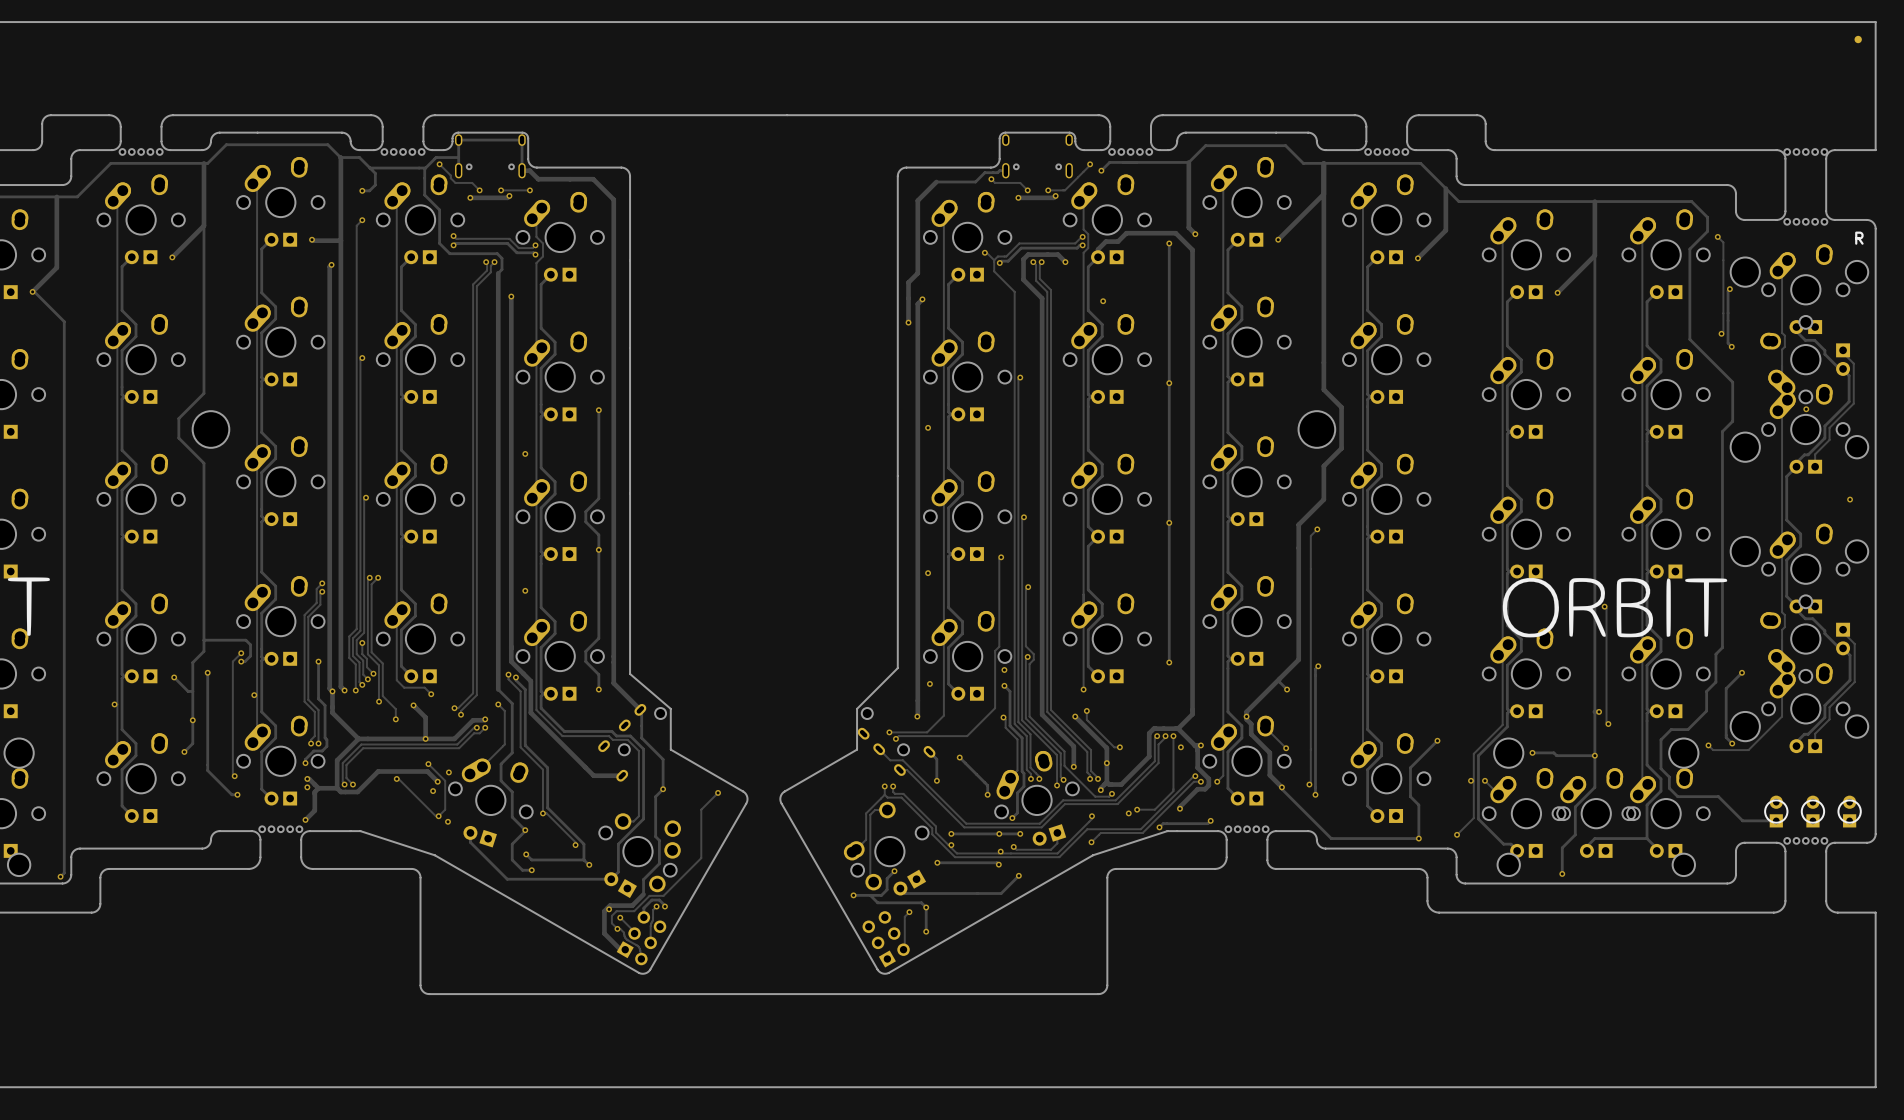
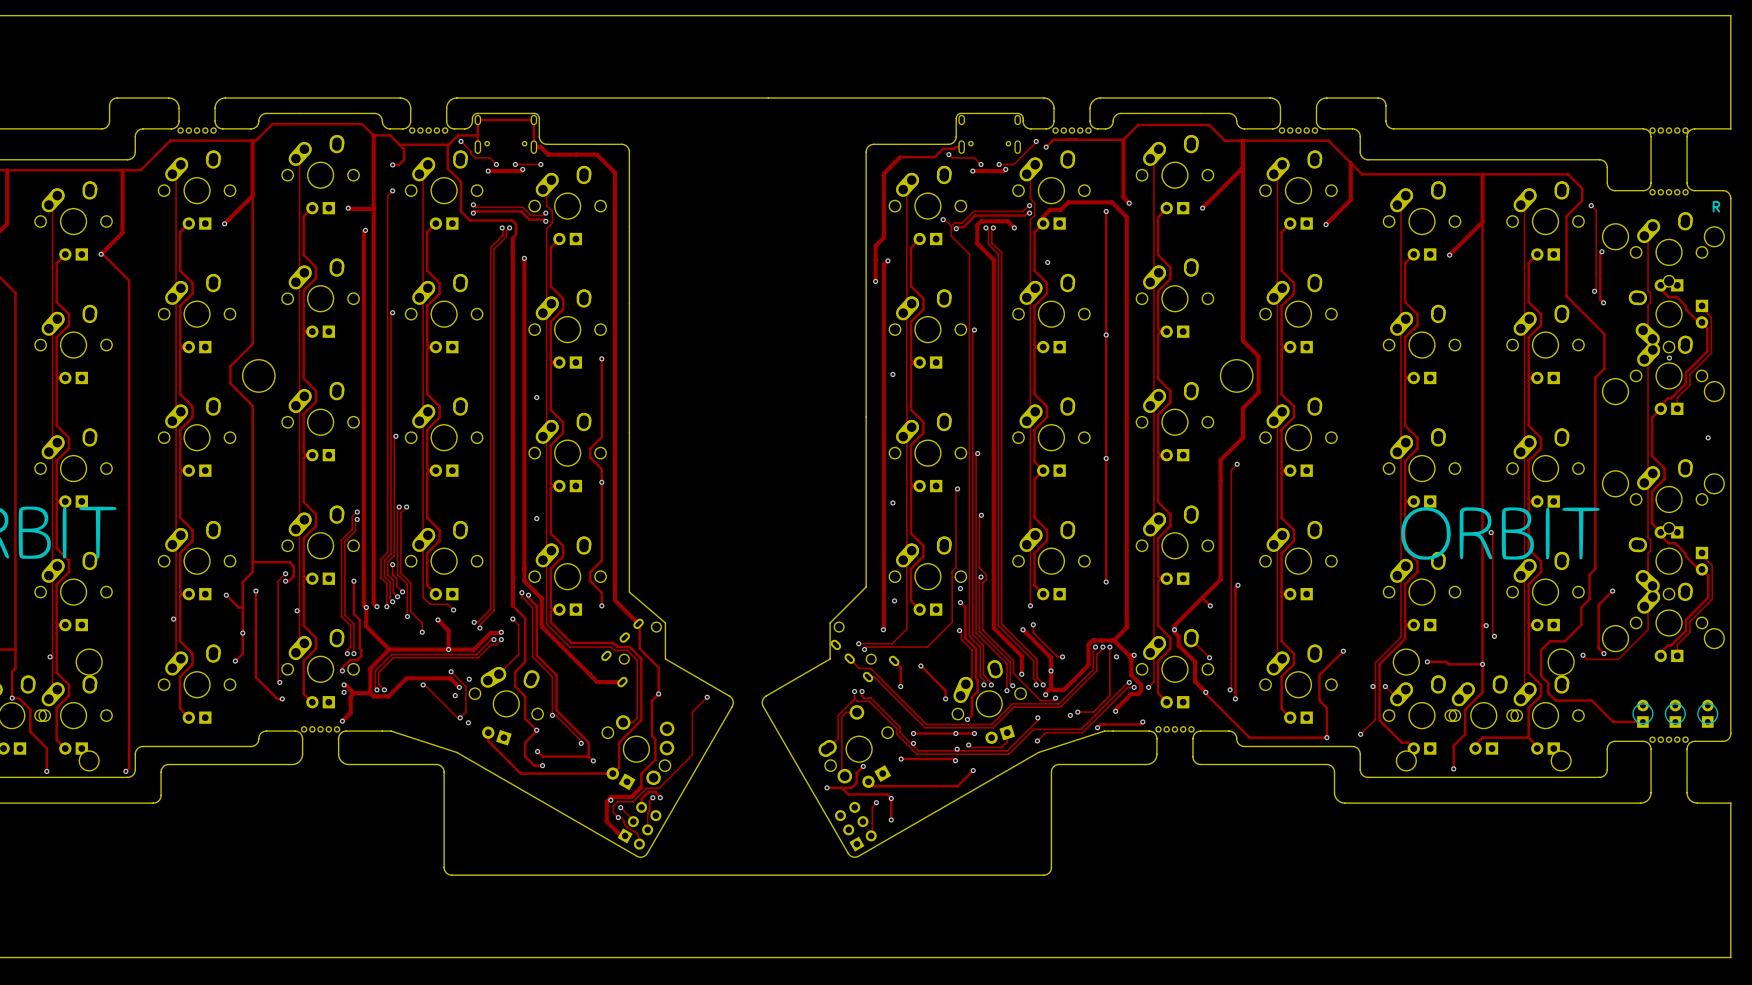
part: (1858, 39) -> none

